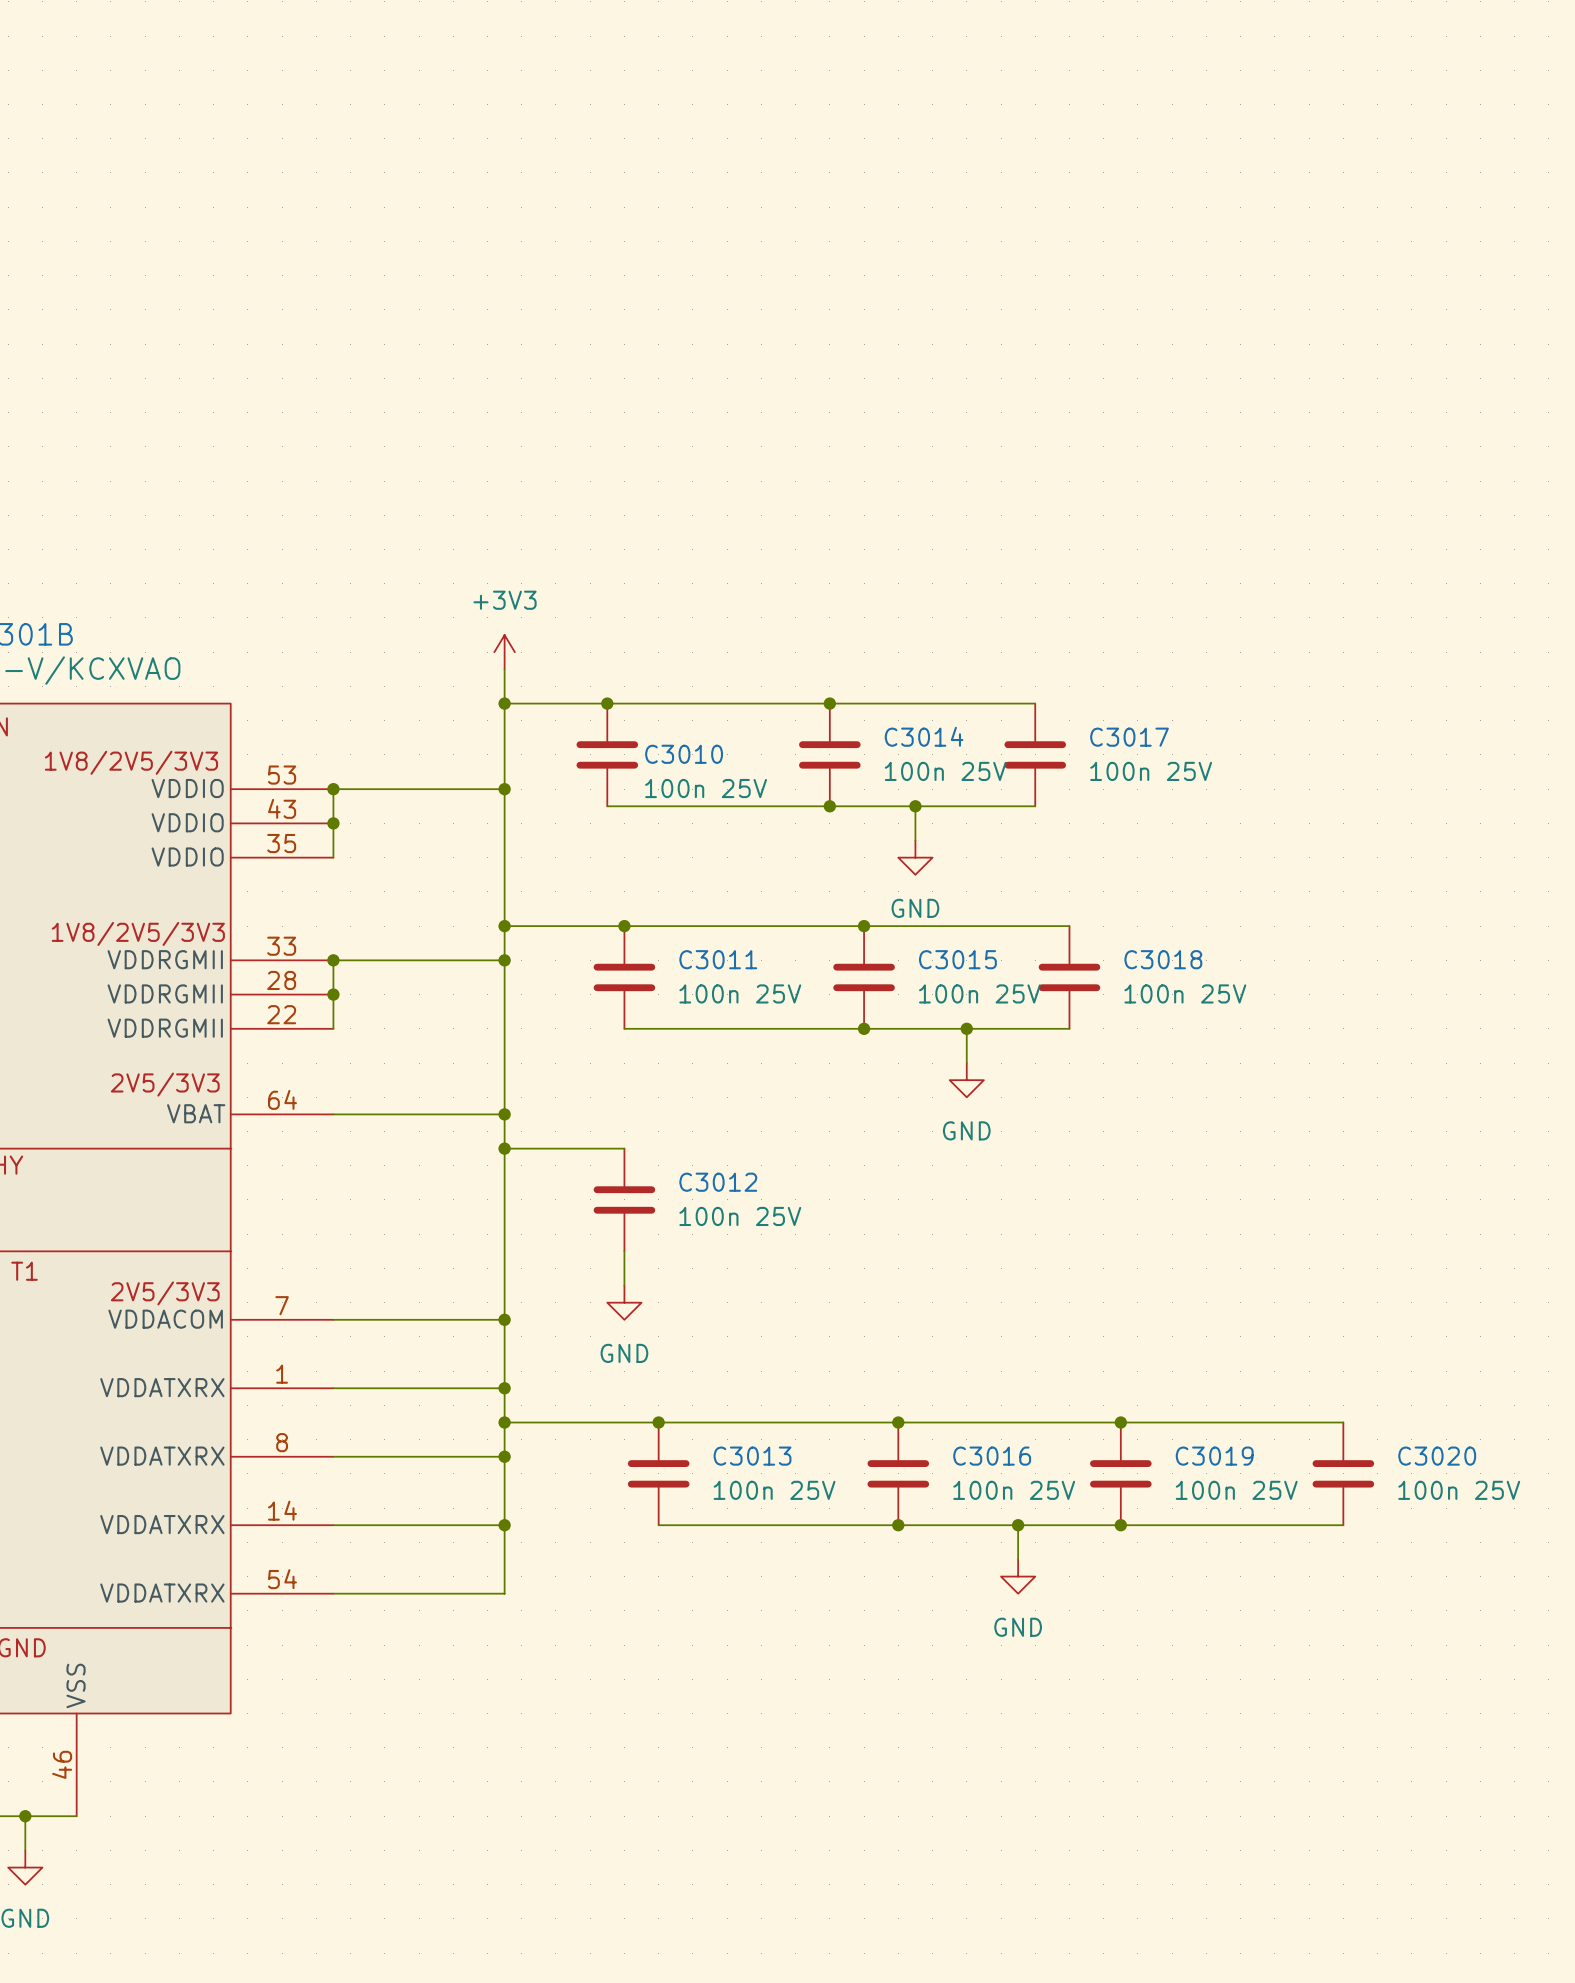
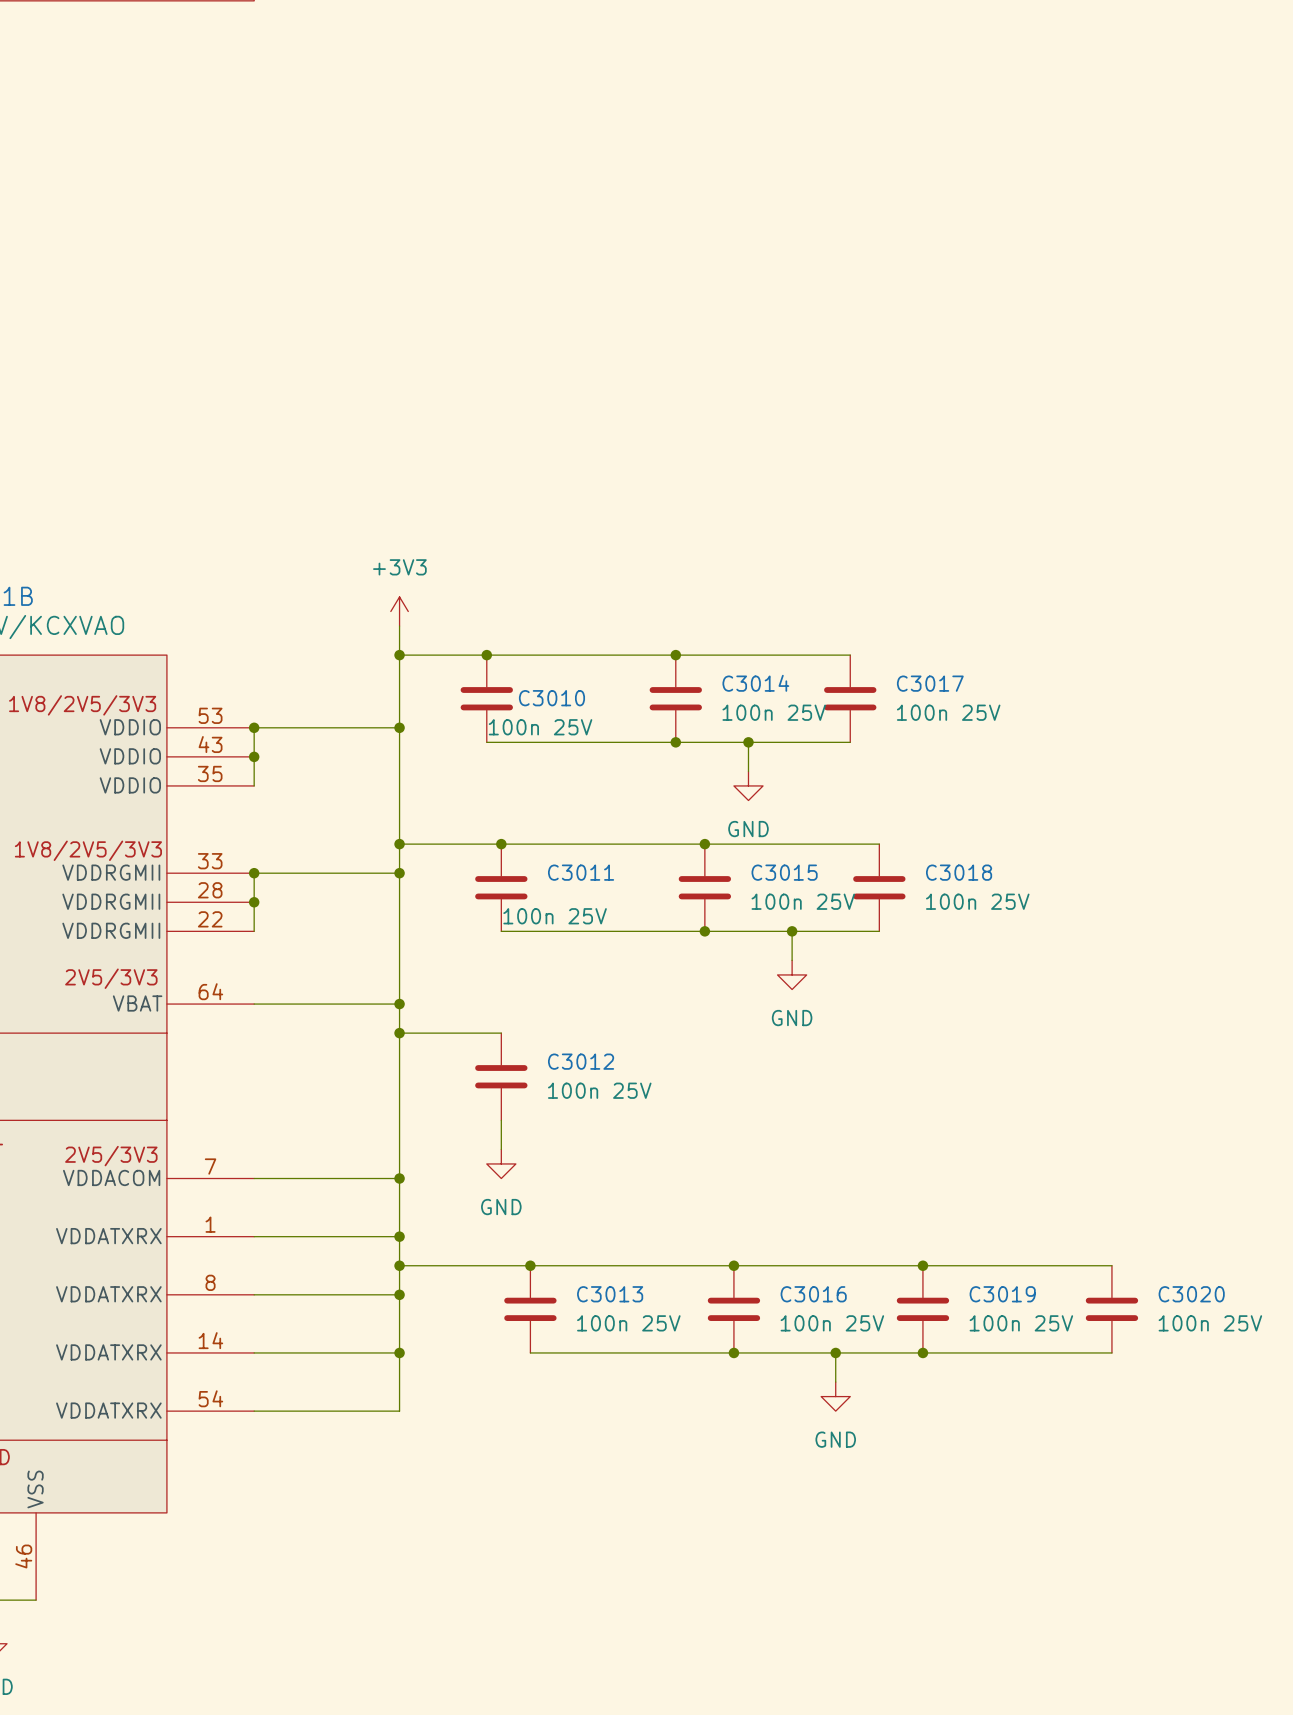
C3010 value position: 100n 25V (706, 788) -> 100n 25V (540, 727)
C3011 value position: 100n 25V (740, 993) -> 100n 25V (555, 916)

